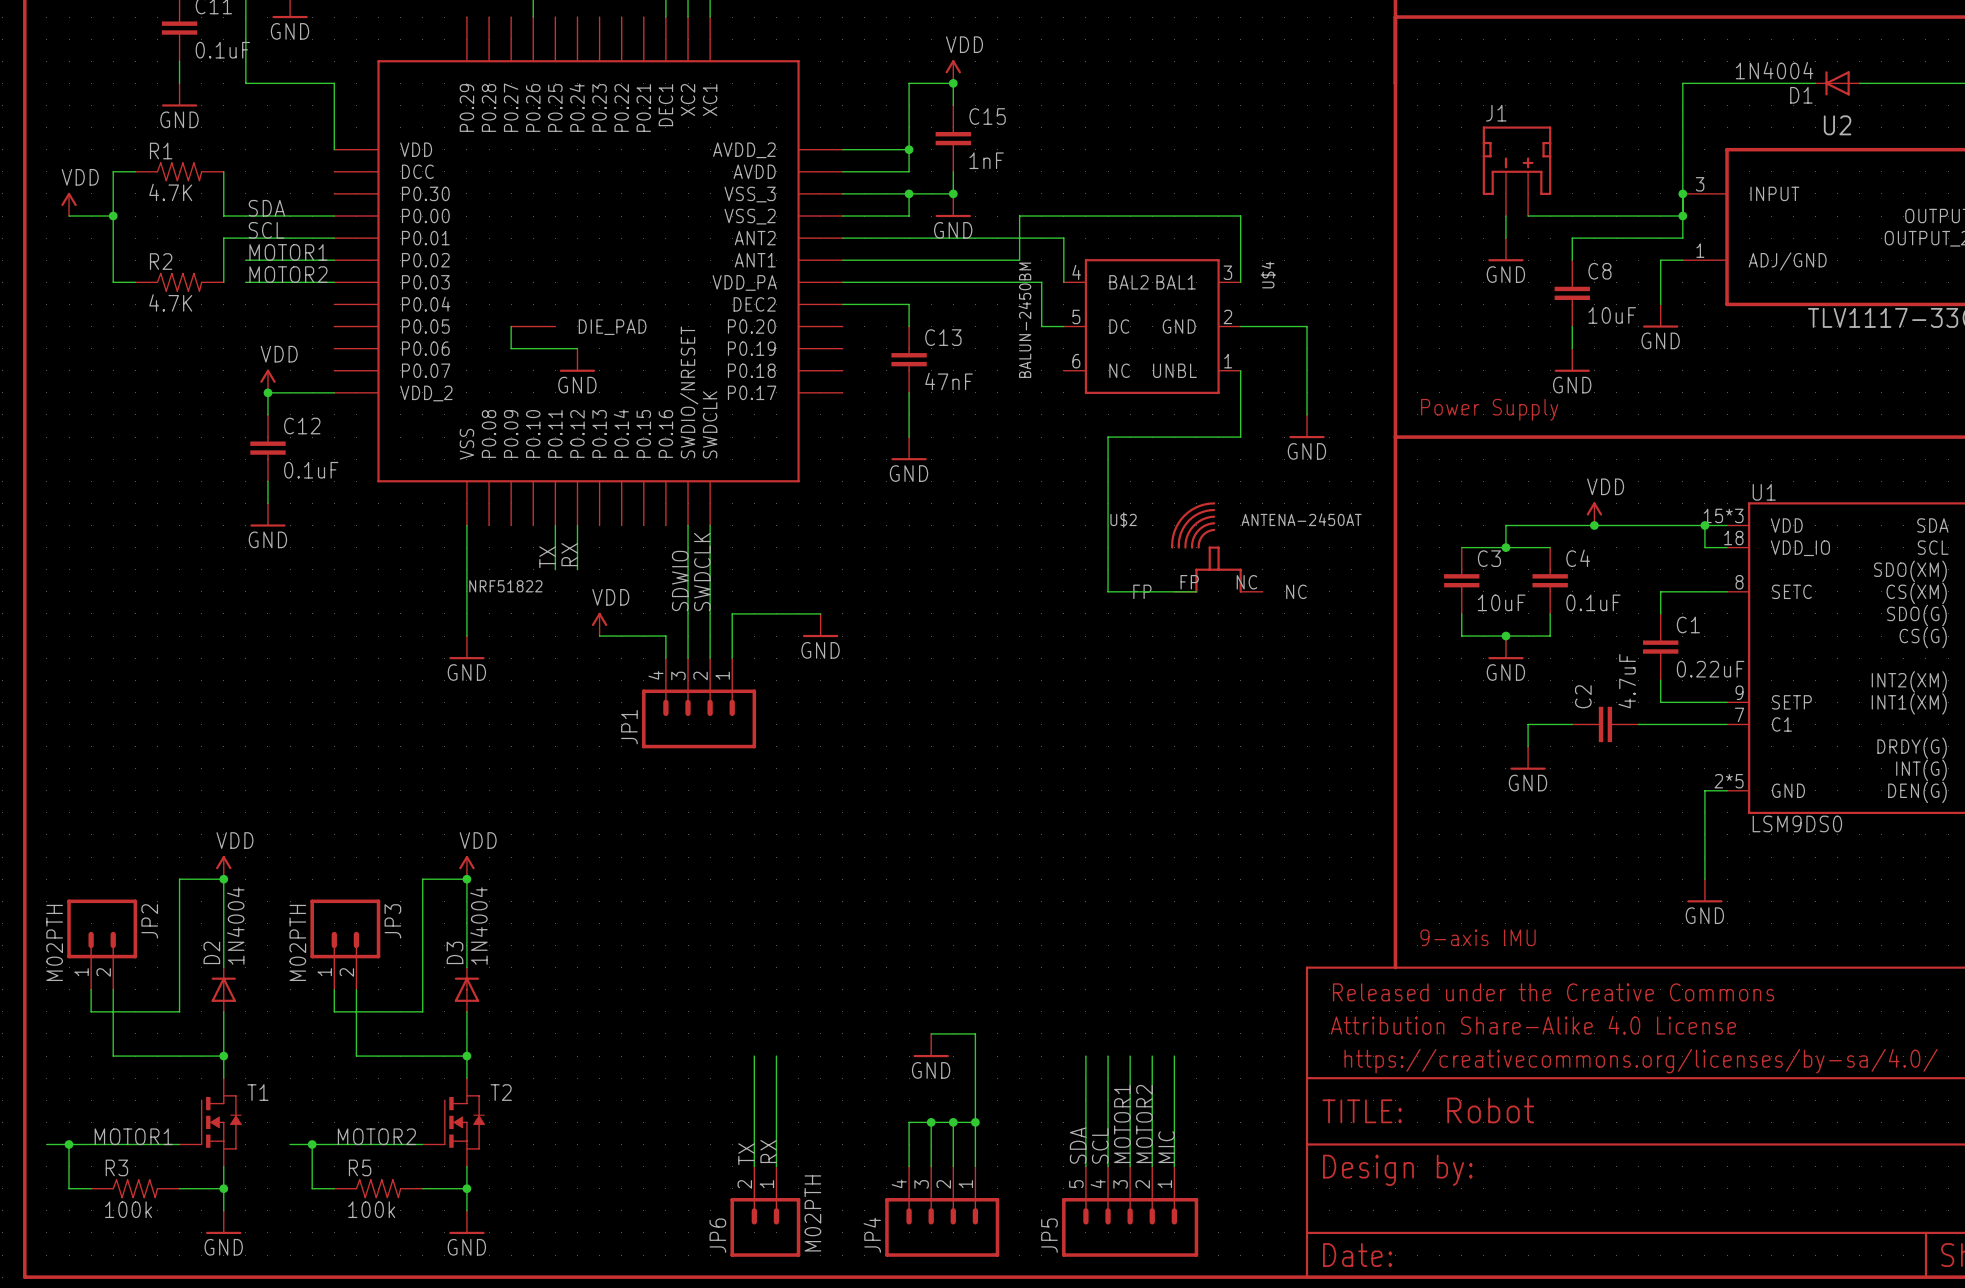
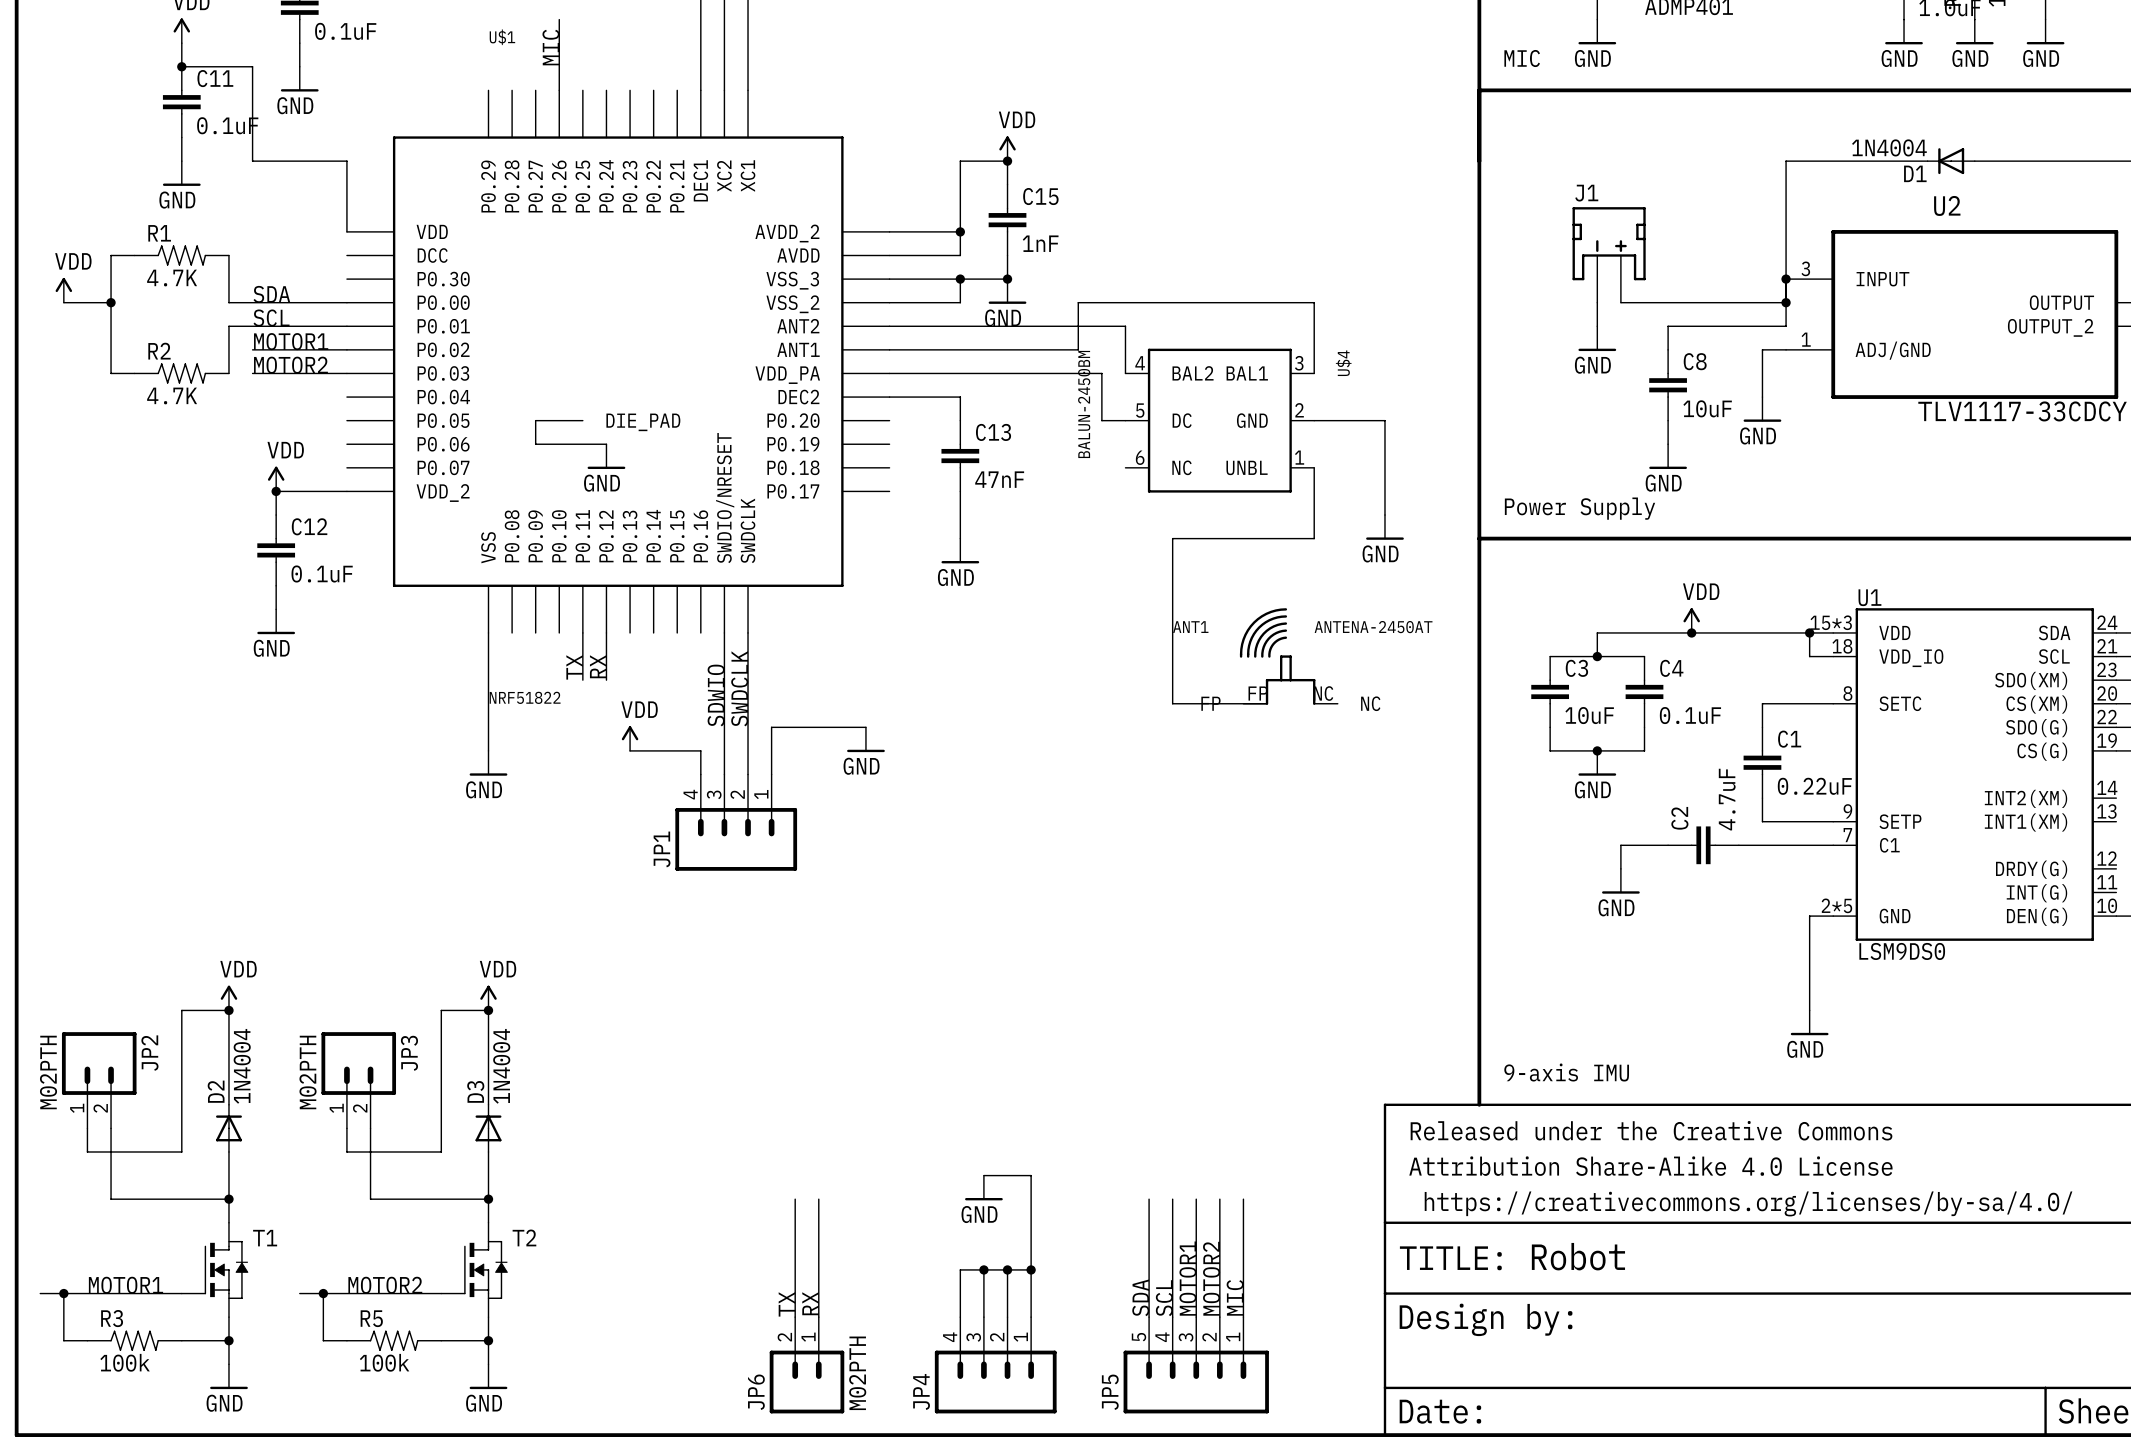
U$2 name: U$2 (1123, 519) -> ANT1 (1190, 627)

